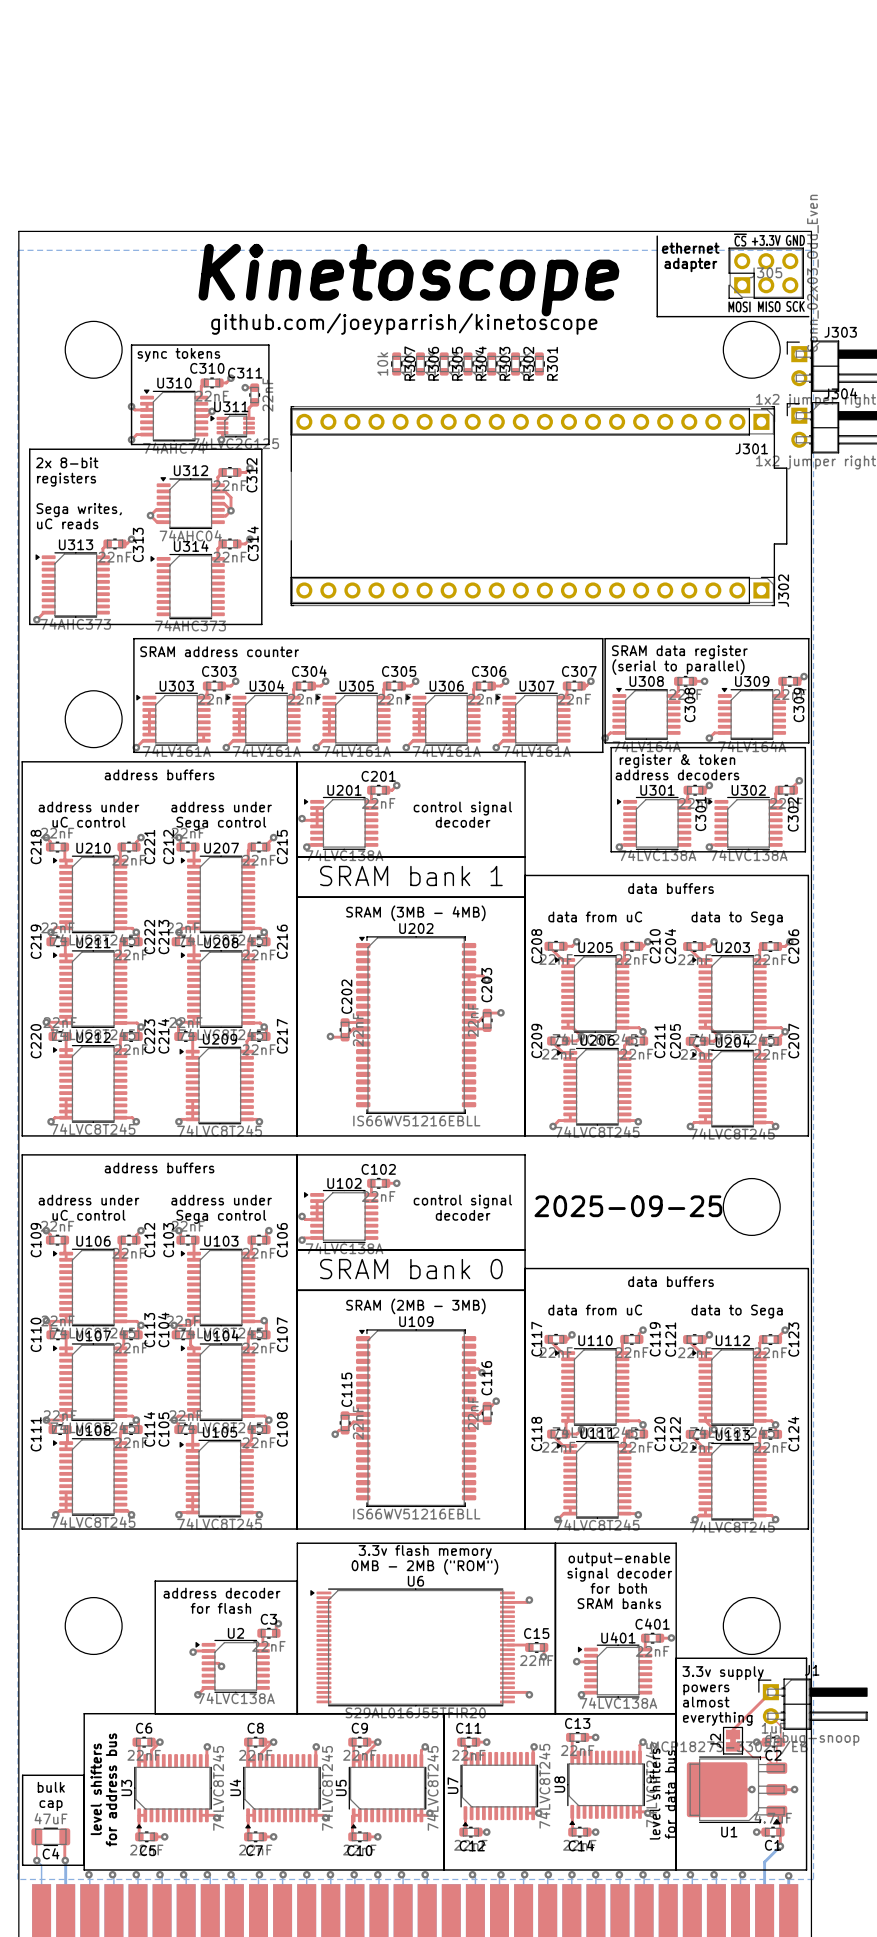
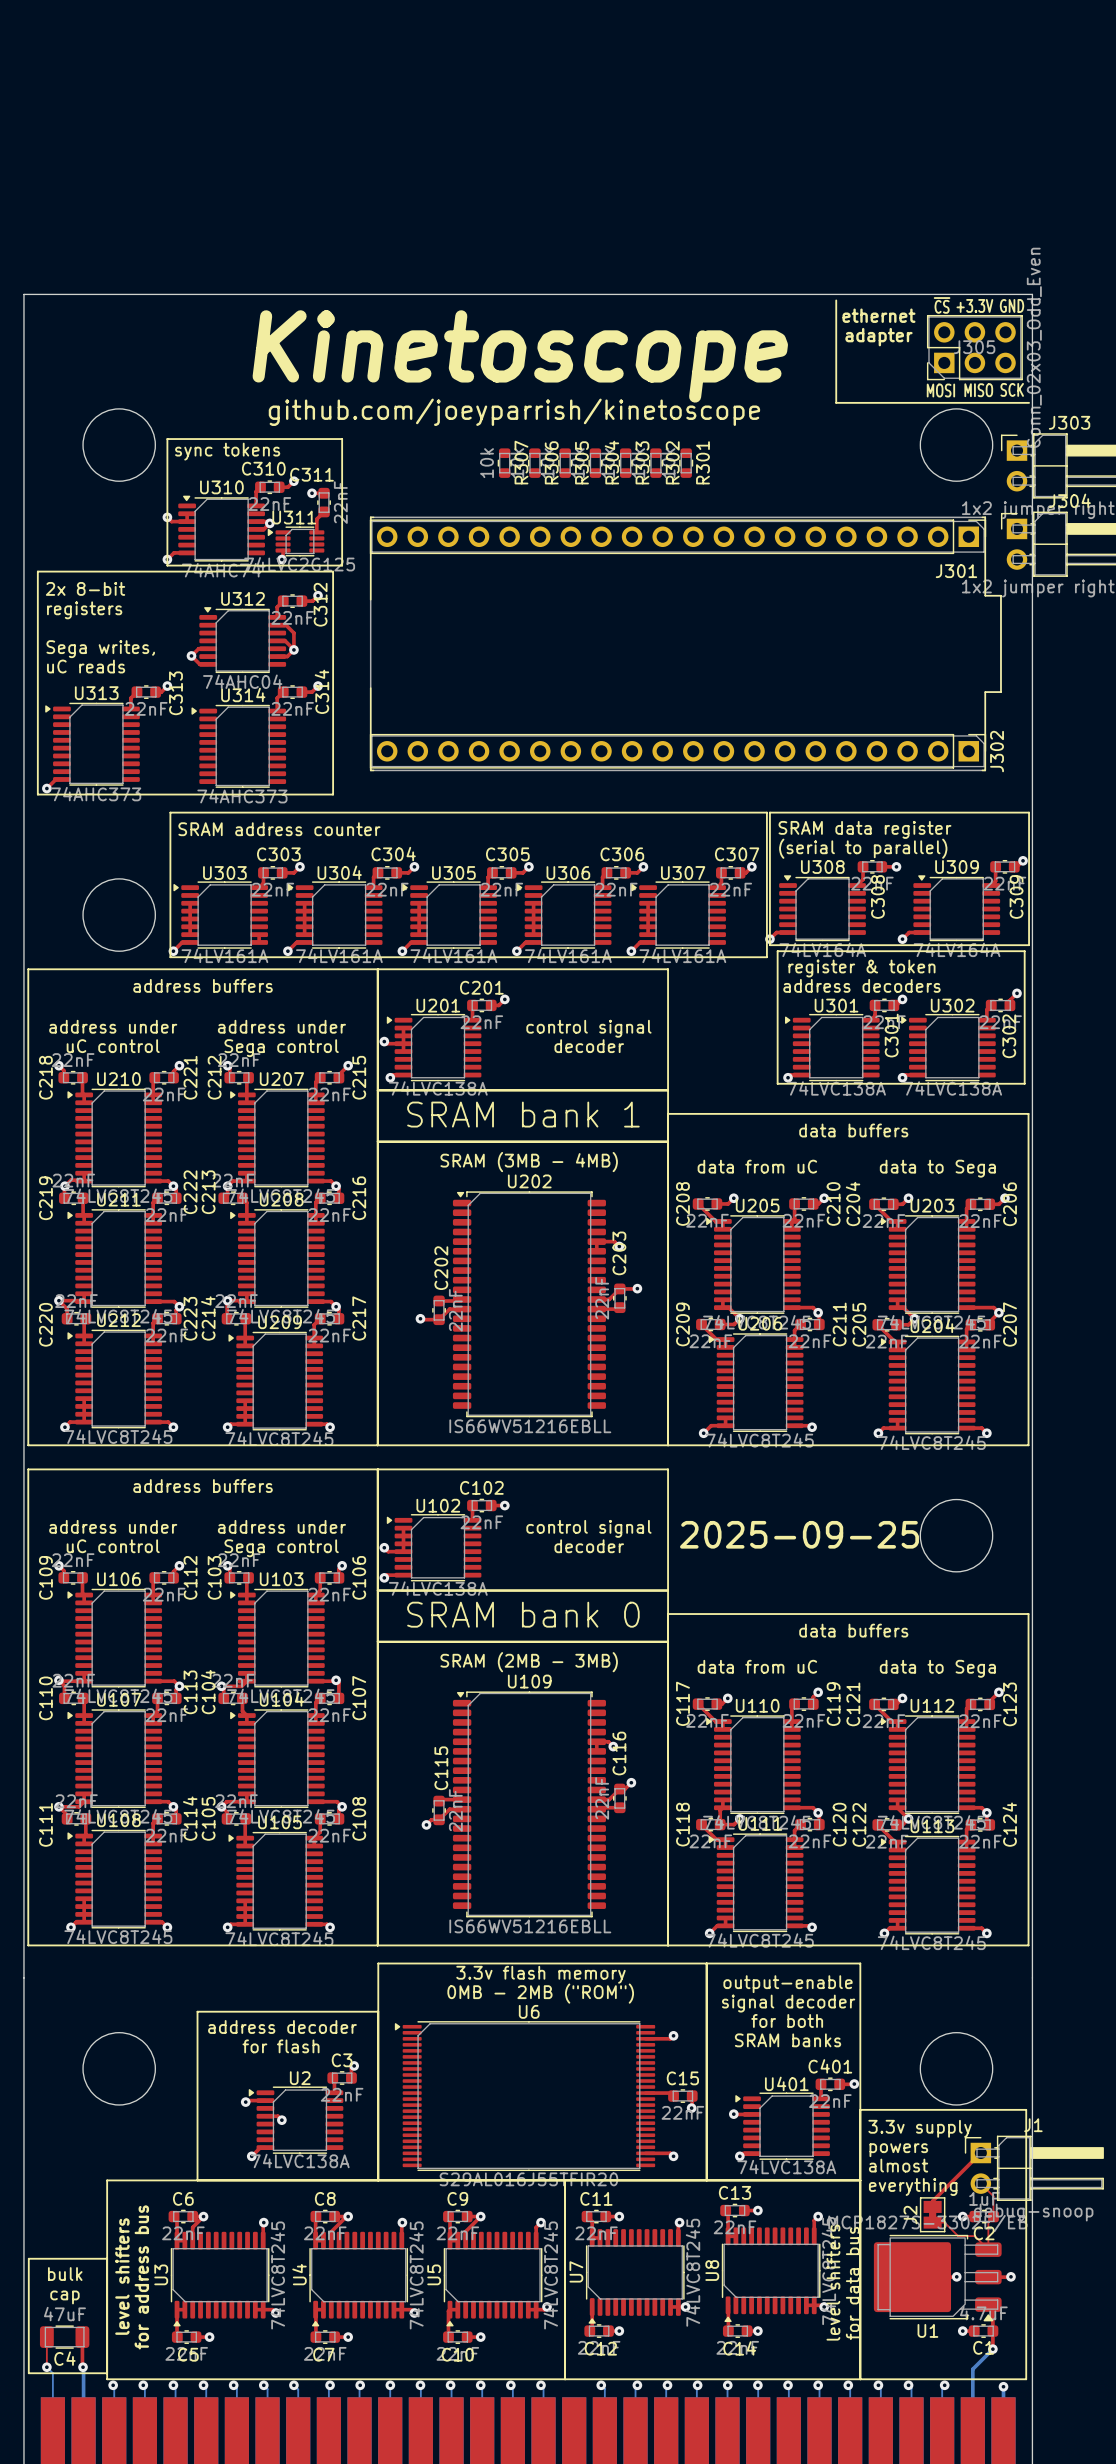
bottom zone outline: (17, 250) (17, 1879) (813, 1879) (813, 250) (17, 250) -> none

